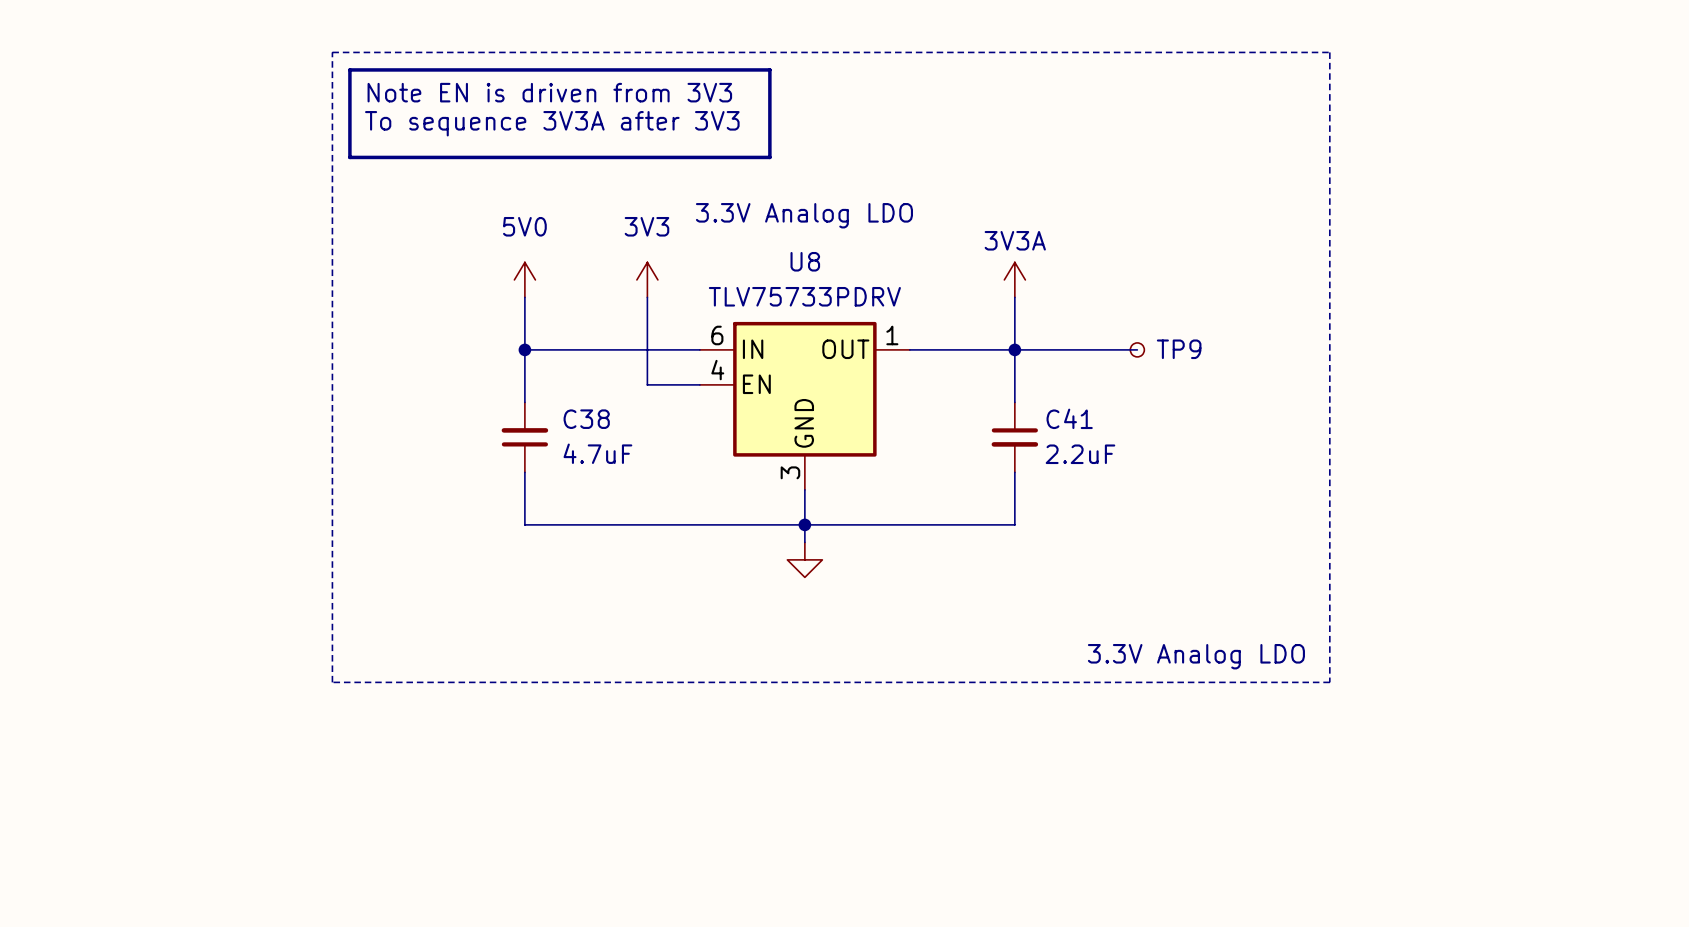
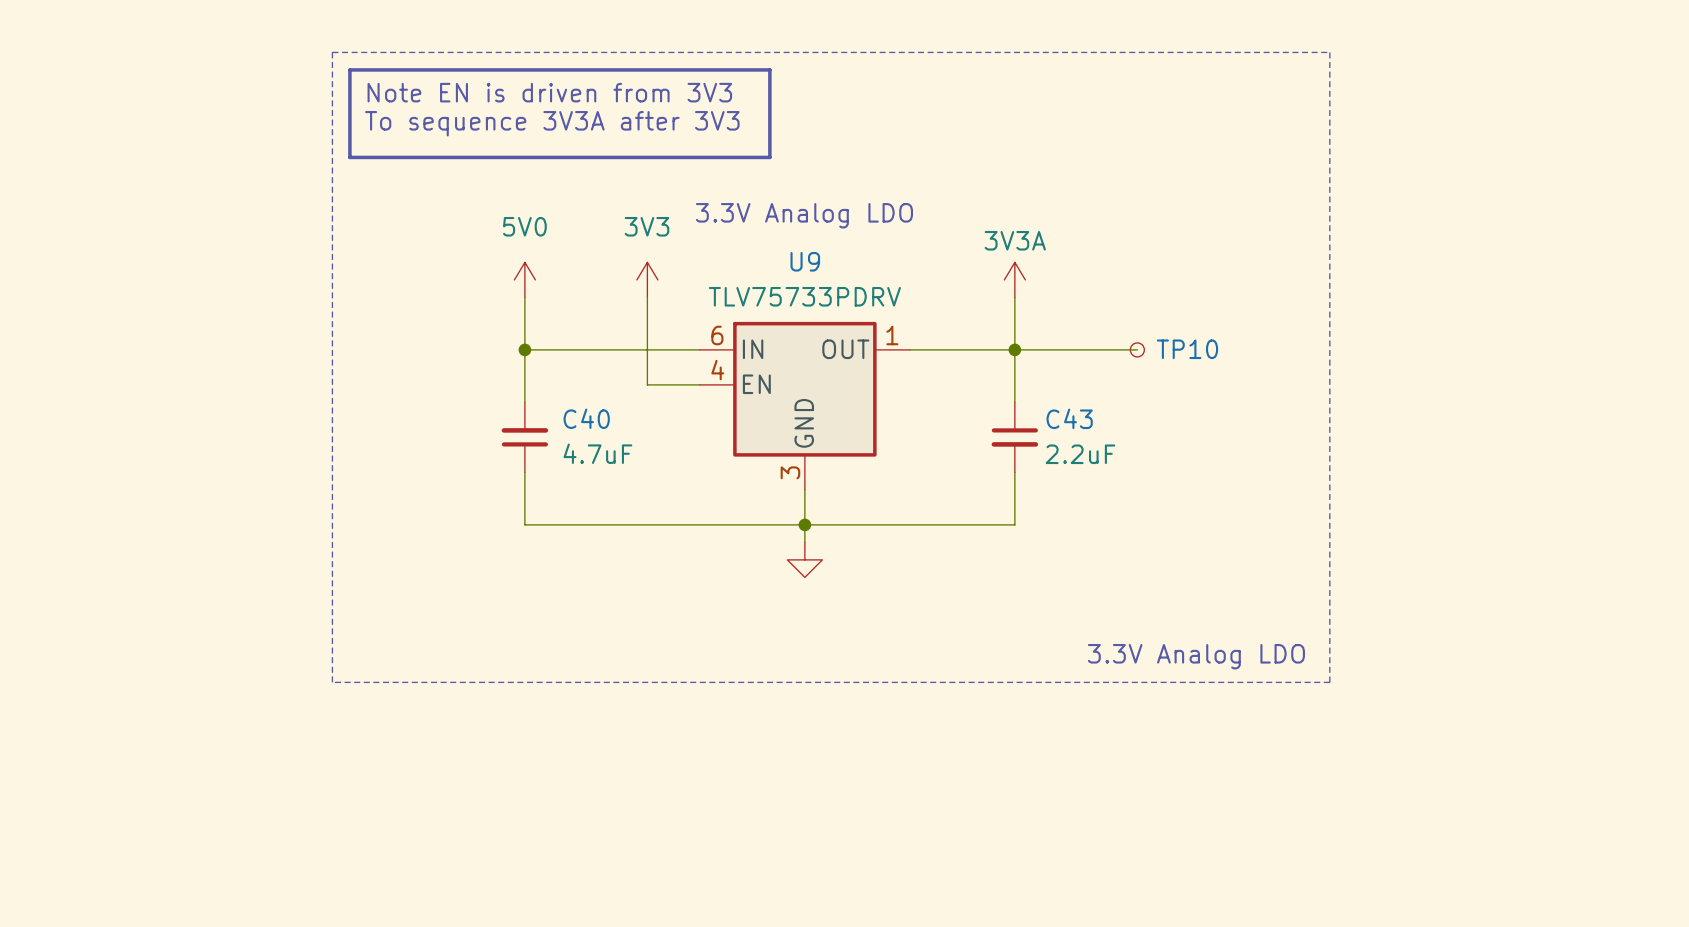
U8 name: U8 (805, 261) -> U9 (805, 261)
TP9 name: TP9 (1179, 349) -> TP10 (1187, 349)
C41 name: C41 (1069, 418) -> C43 (1069, 418)
C38 name: C38 (586, 419) -> C40 (586, 418)

